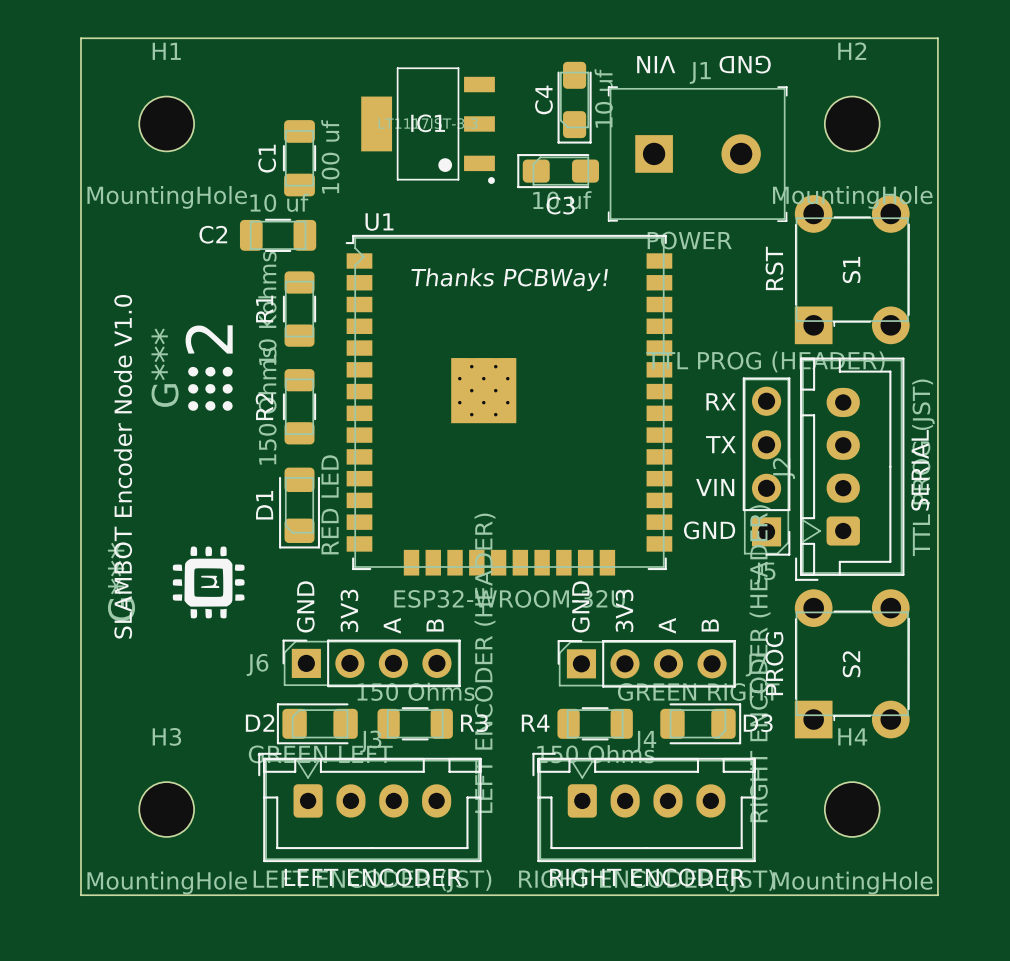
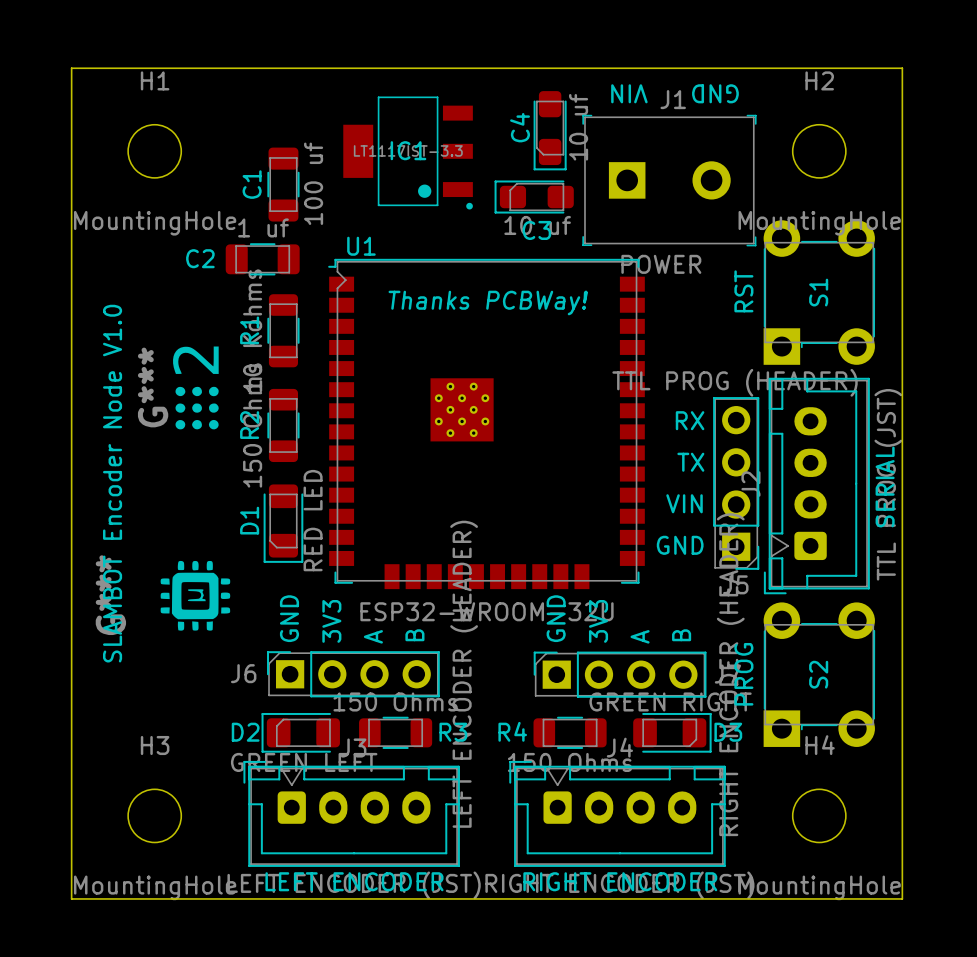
C2 value: 10 uf (279, 202) -> 1 uf (263, 227)

